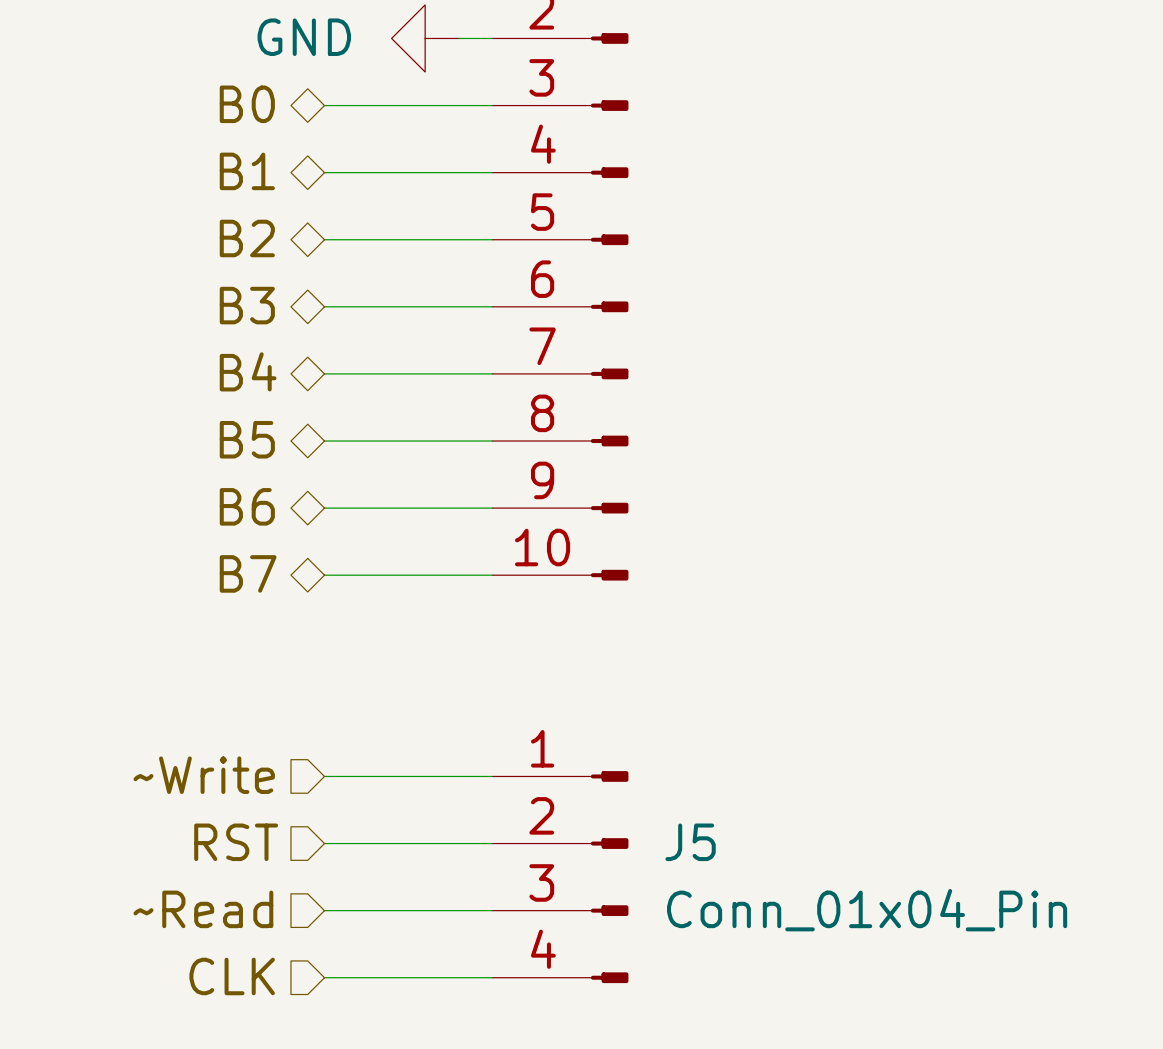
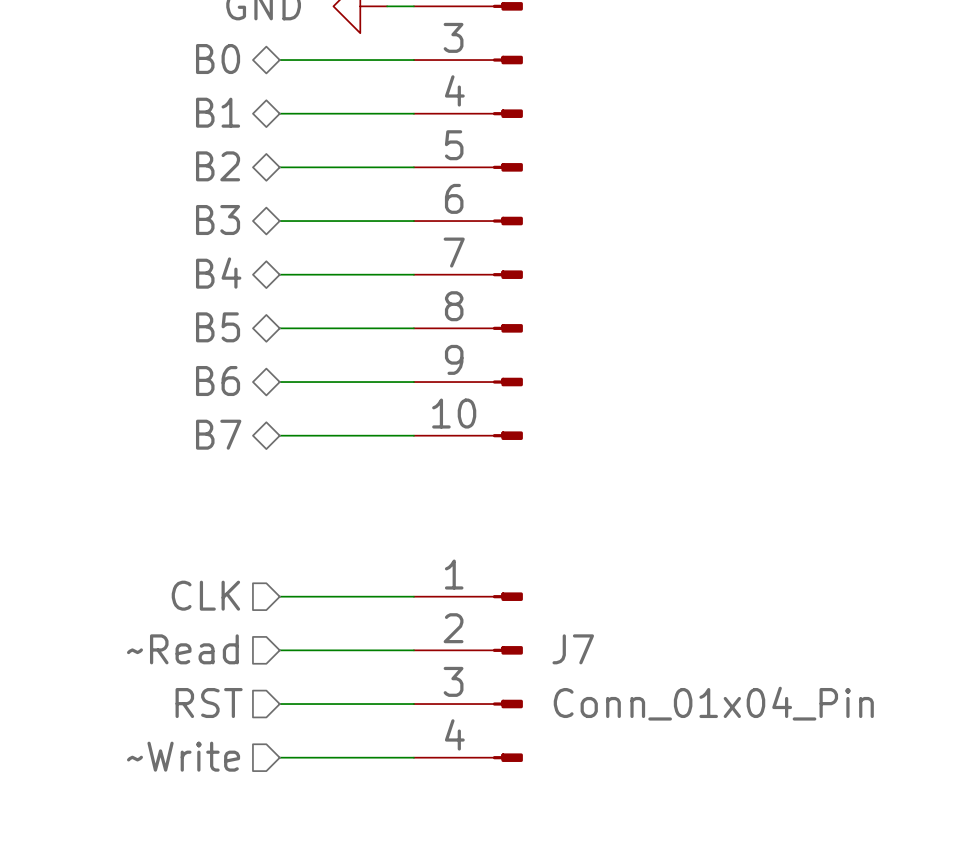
hierarchical label: ~Write (204, 775) -> CLK (205, 595)
hierarchical label: RST (236, 842) -> ~Read (182, 649)
J5 name: J5 (690, 842) -> J7 (573, 649)
hierarchical label: ~Read (203, 909) -> RST (209, 703)
hierarchical label: CLK (232, 976) -> ~Write (183, 756)

